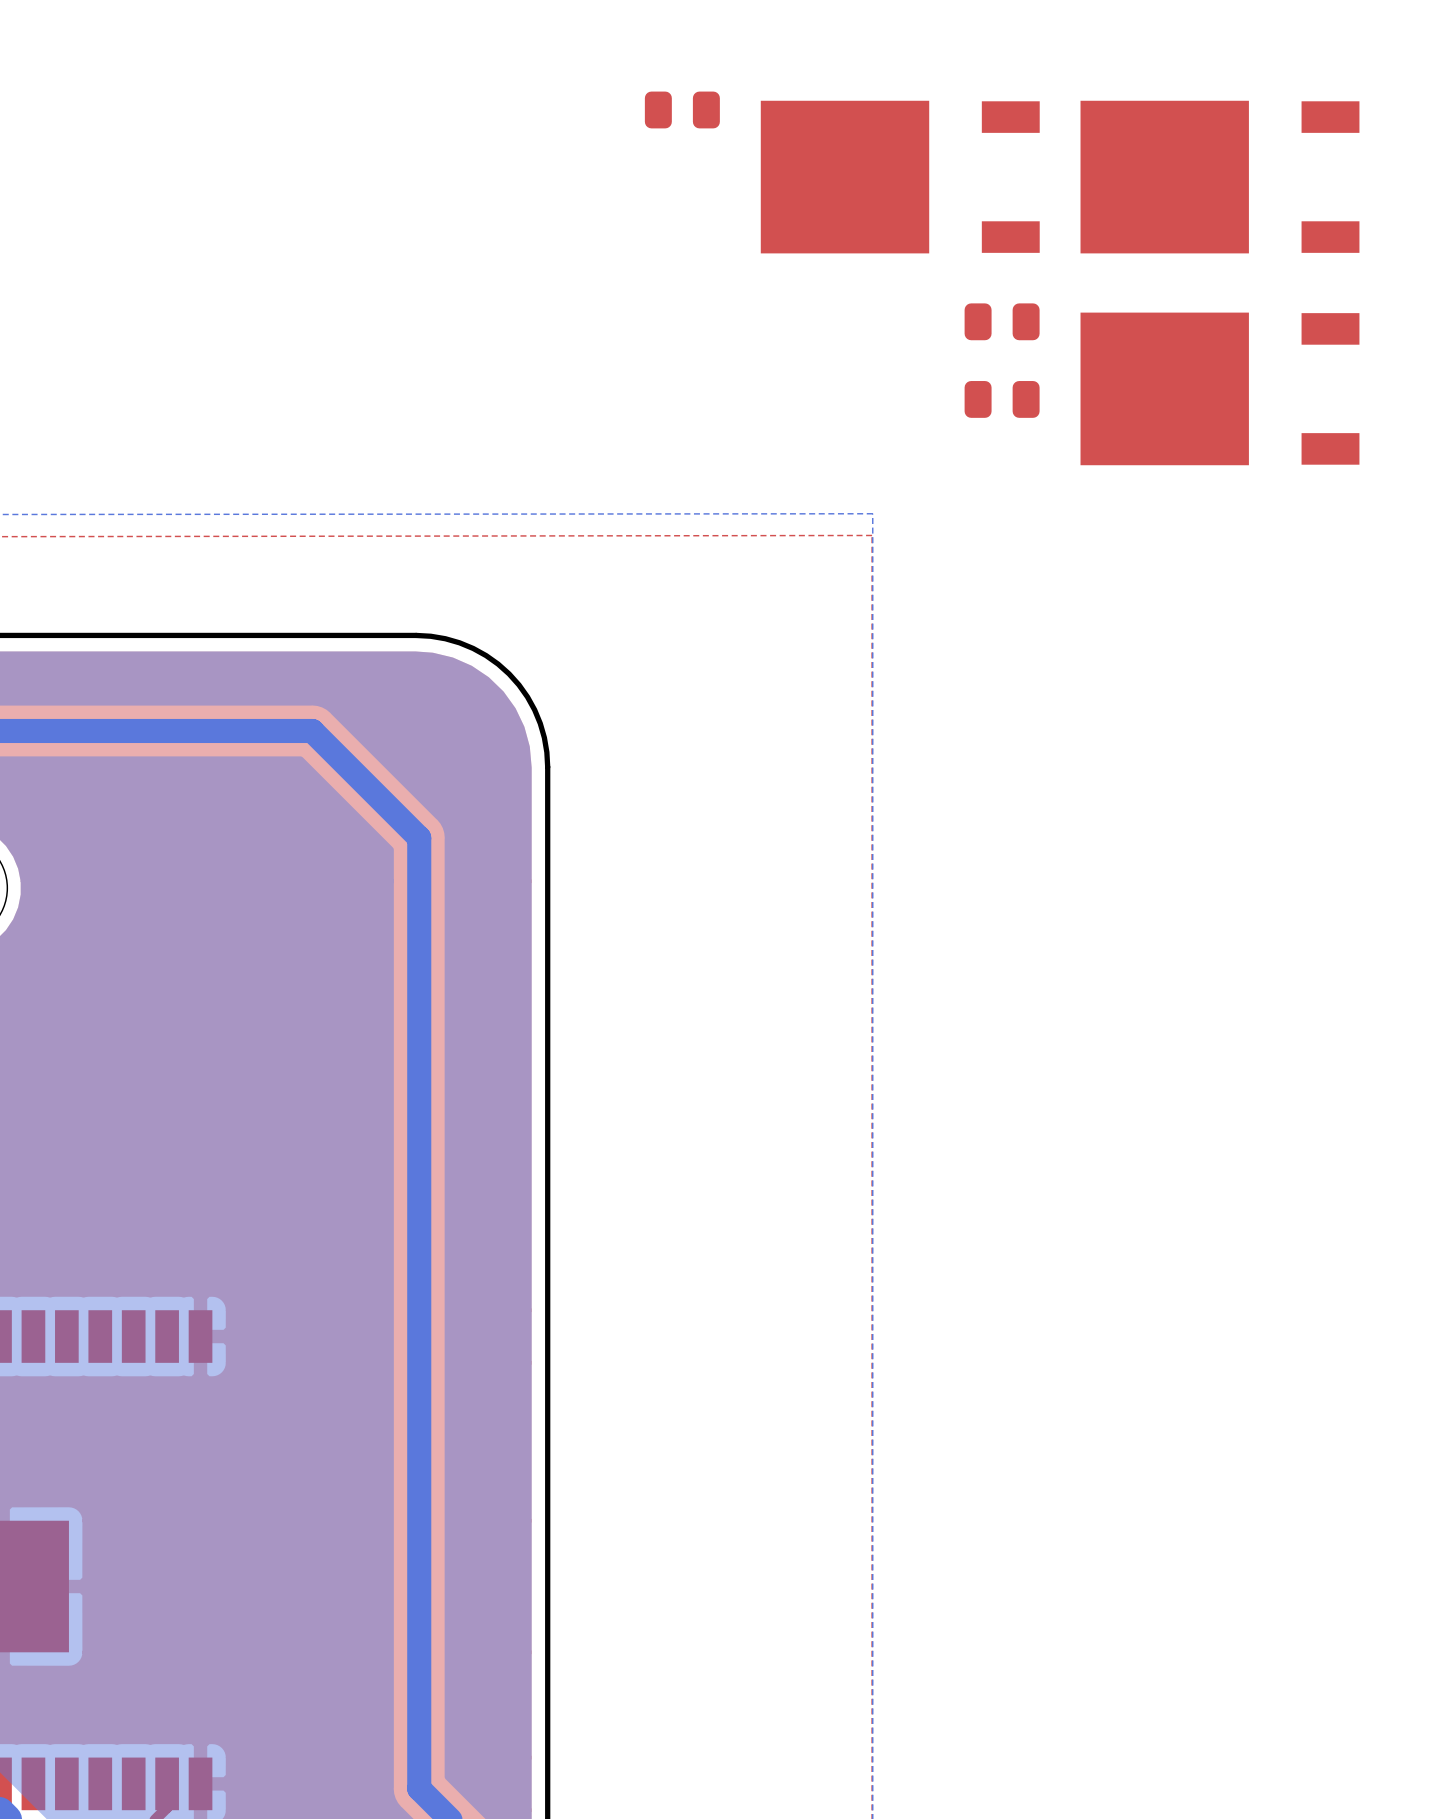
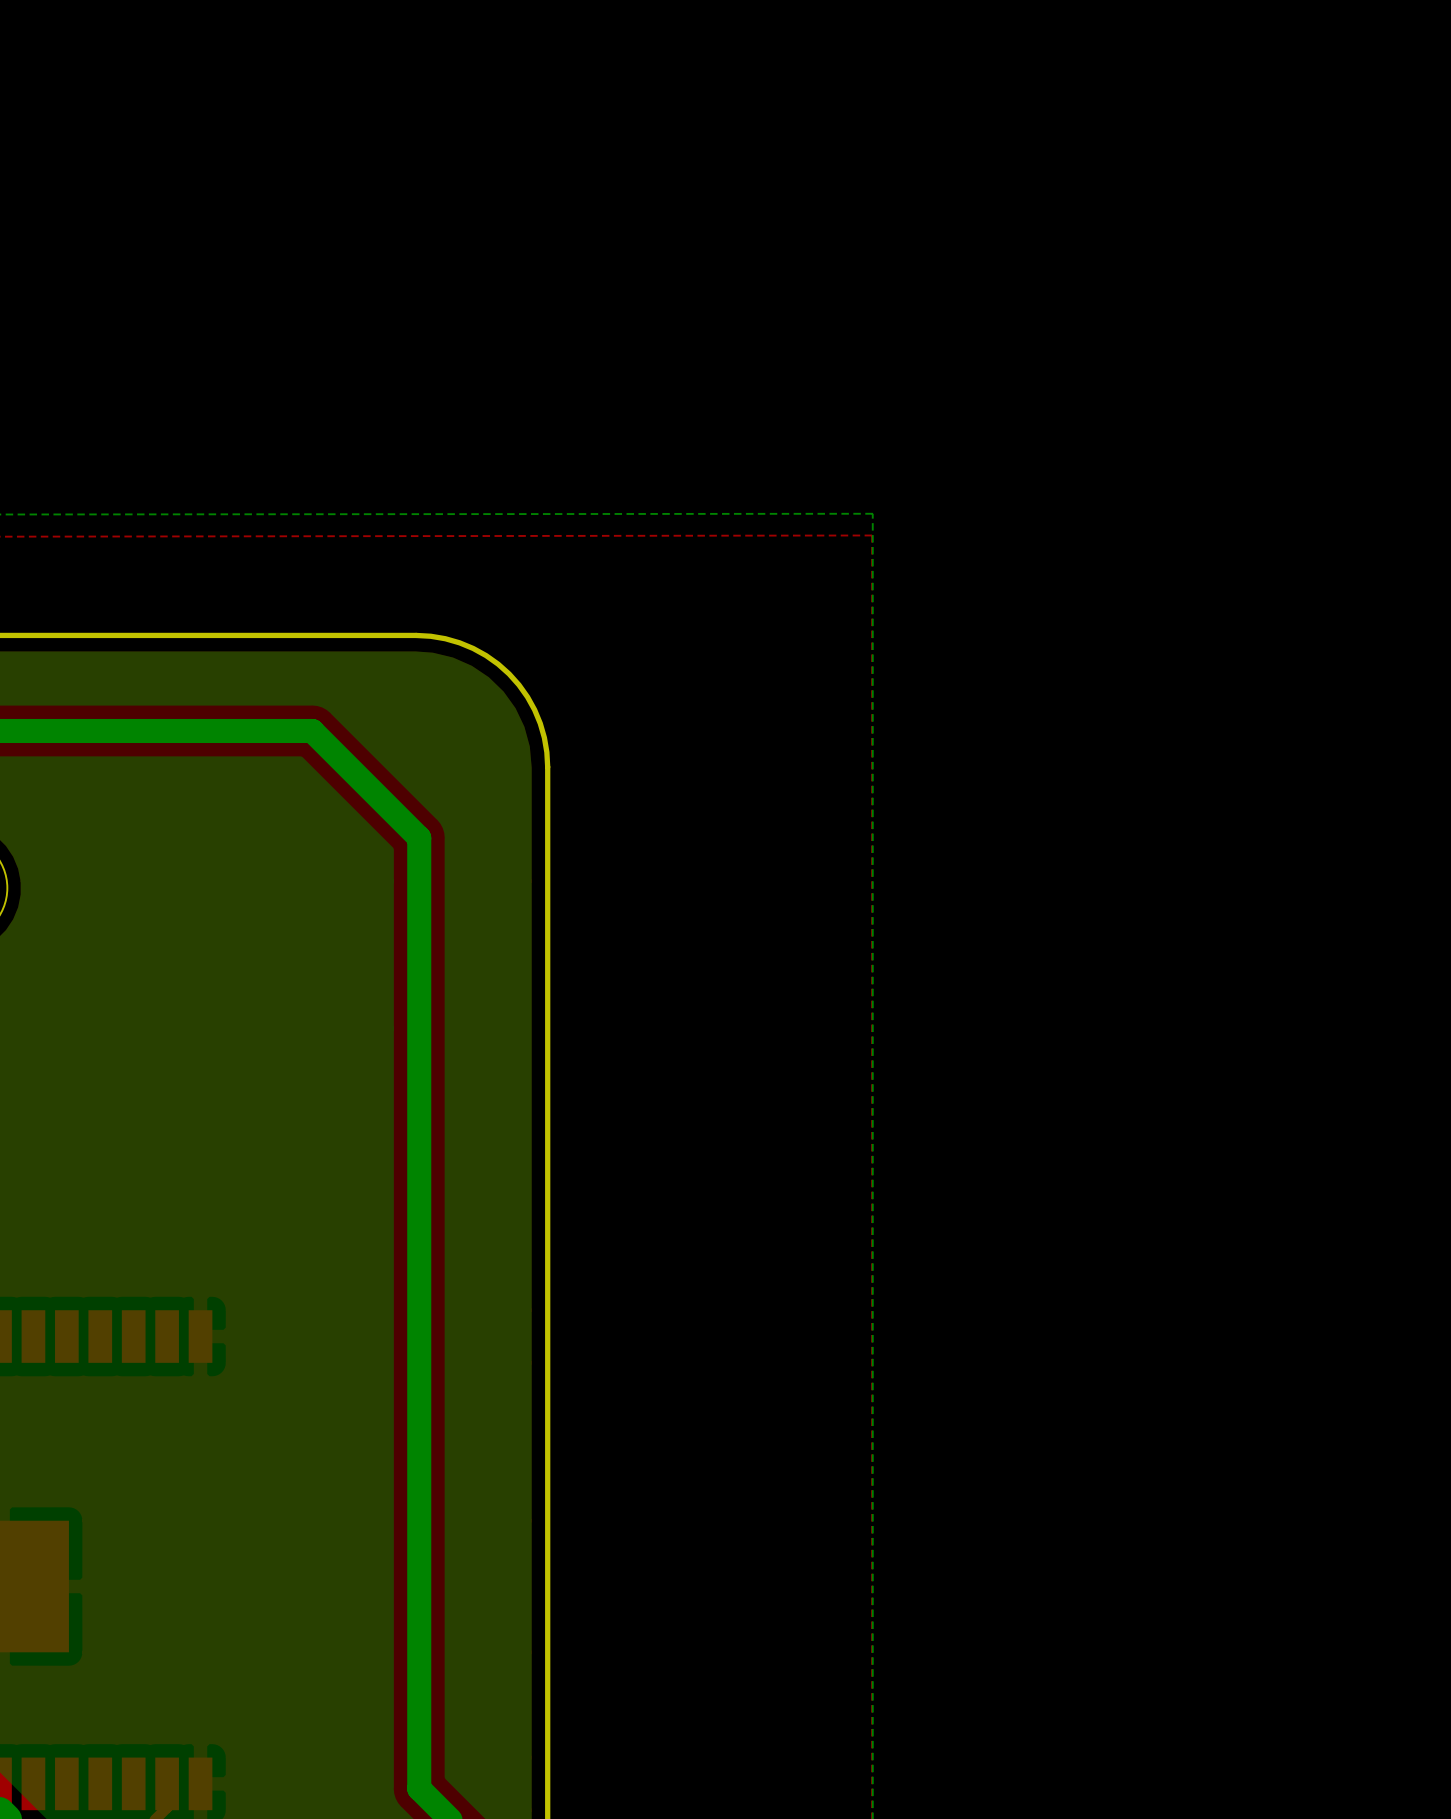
part: (682, 109) -> none
part: (900, 177) -> none
part: (1219, 177) -> none
part: (1002, 321) -> none
part: (1219, 388) -> none
part: (1002, 399) -> none

